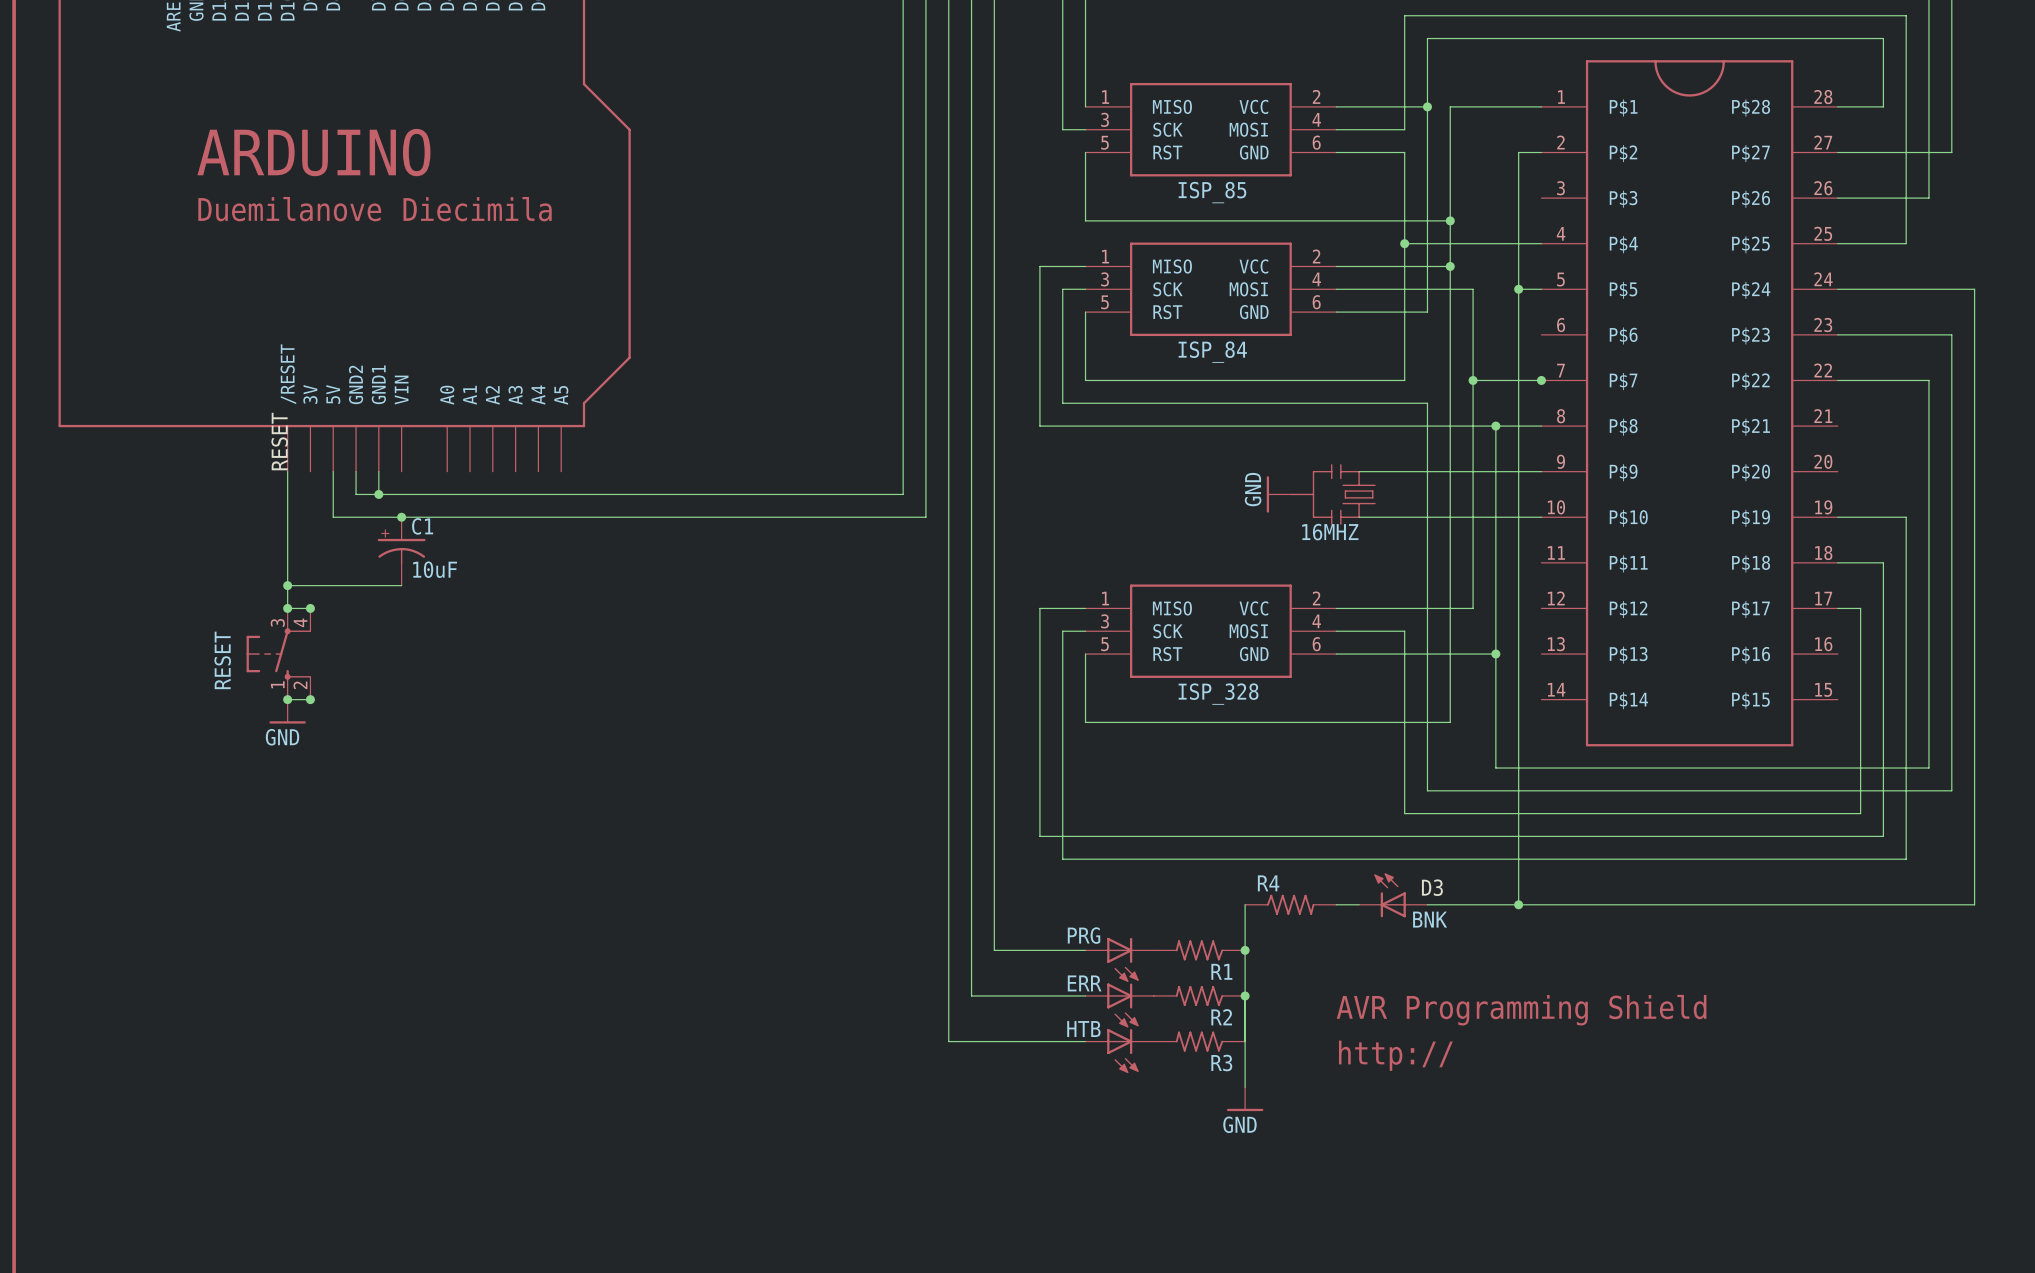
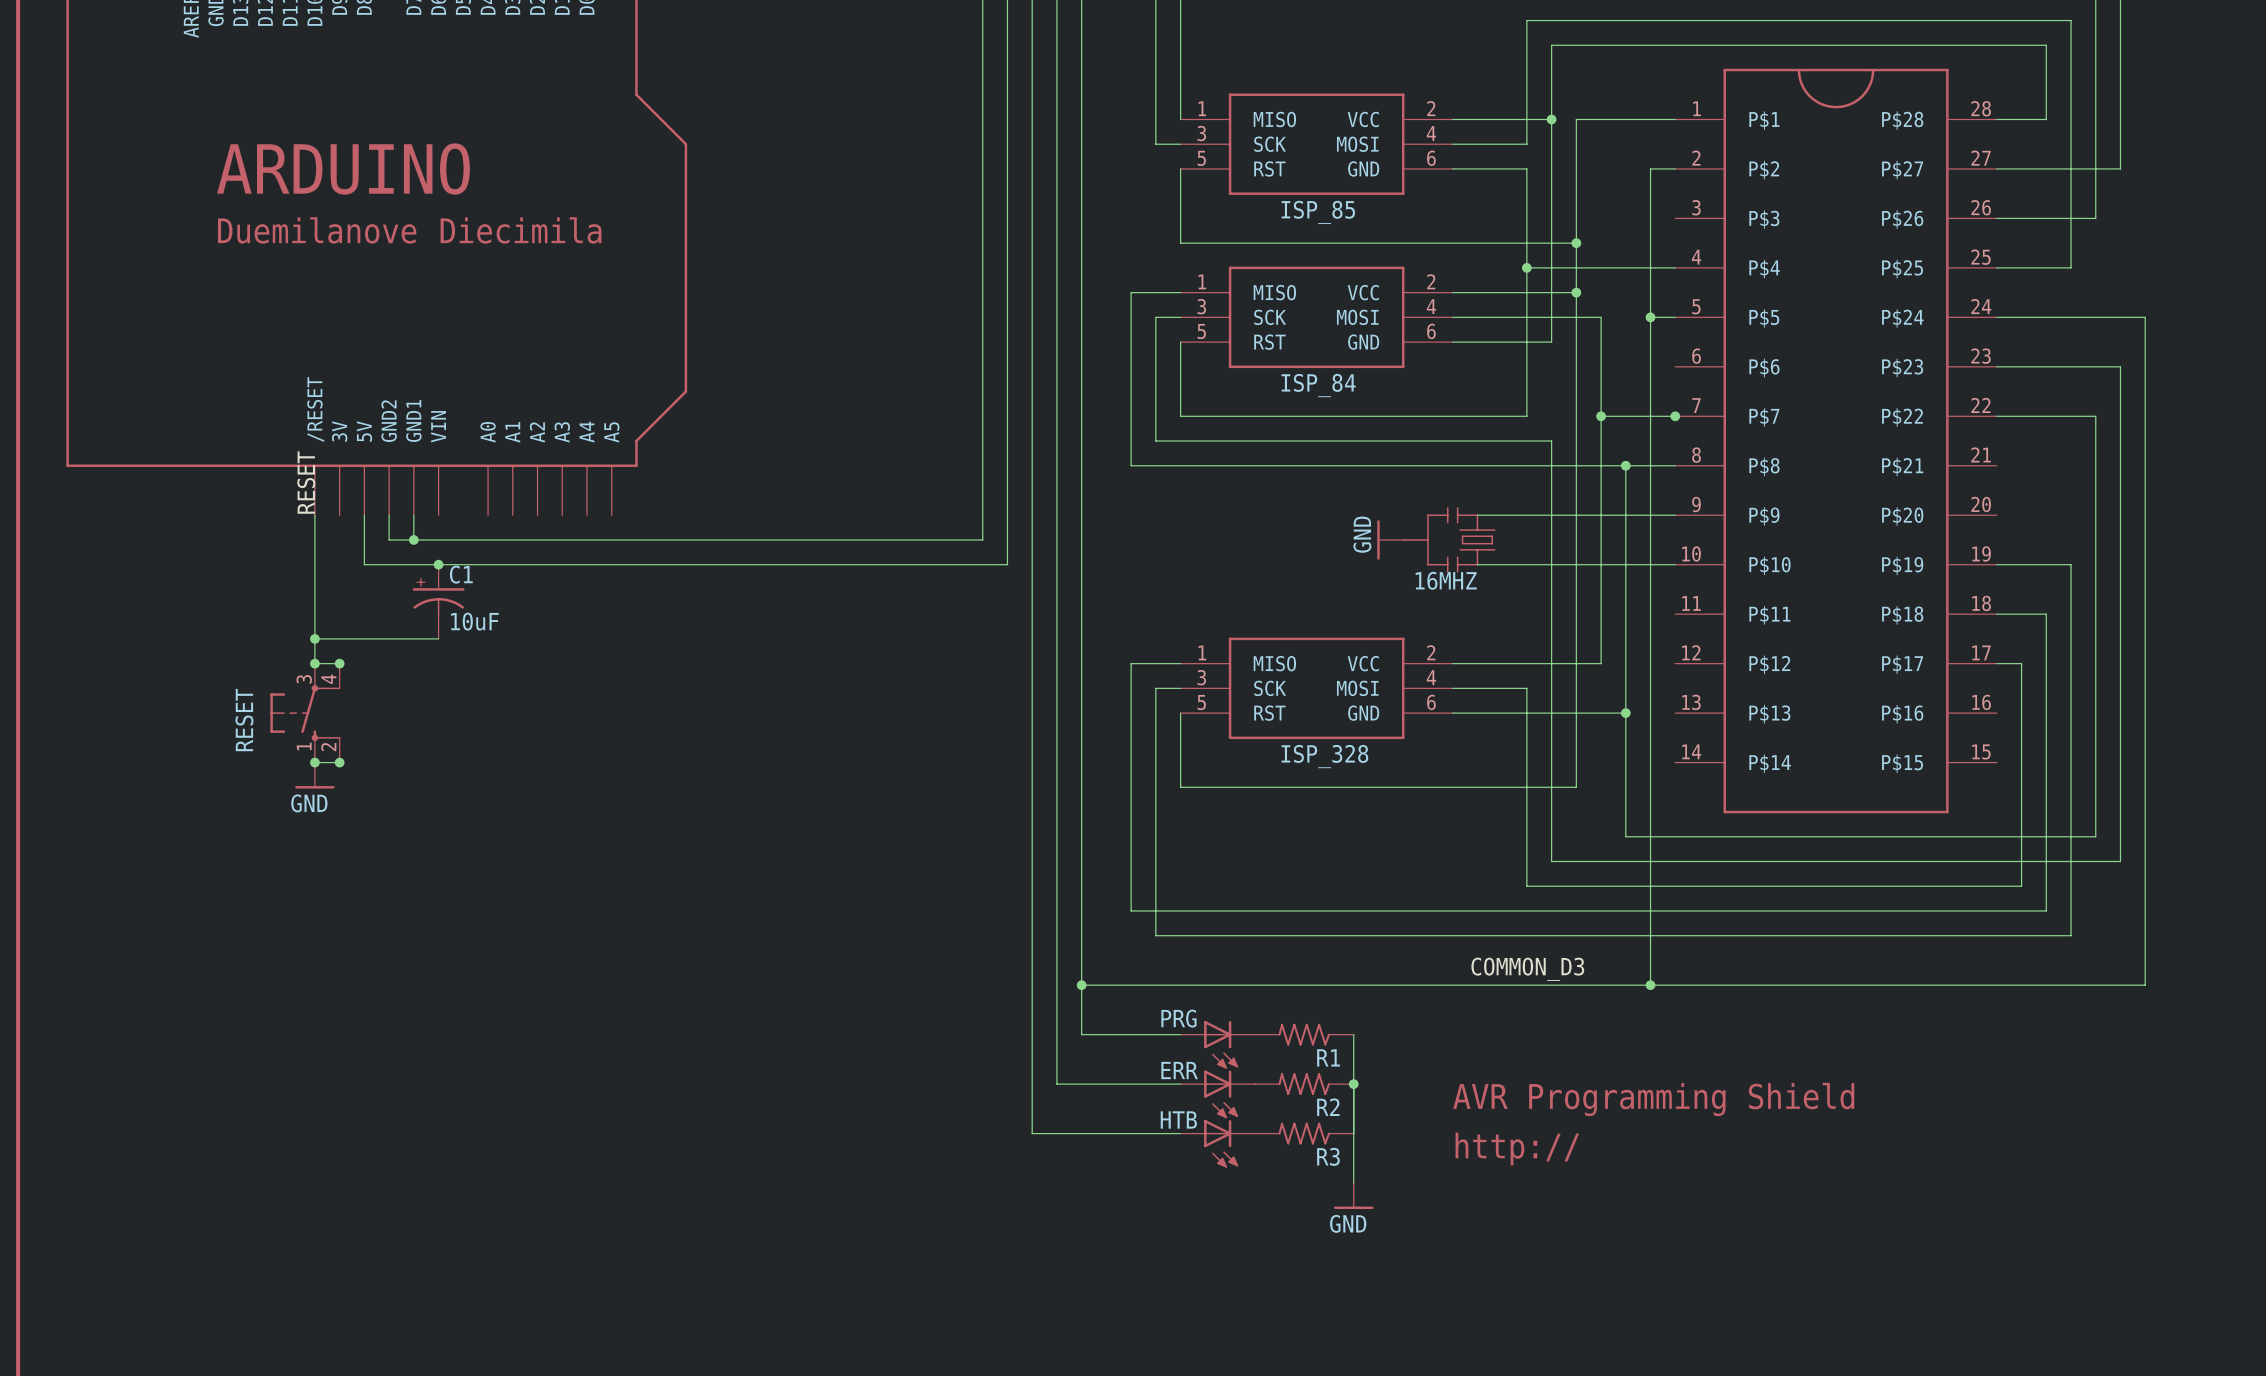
label: D3 (1432, 887) -> none
label: none -> COMMON_D3 (1527, 969)
BNK: (1393, 895) -> none
wire: none -> (1081, 985) (1452, 985)
junction: none -> (1081, 985)
wire: (1245, 904) (1245, 950) -> none
R4: (1290, 904) -> none
junction: (1245, 950) -> none

